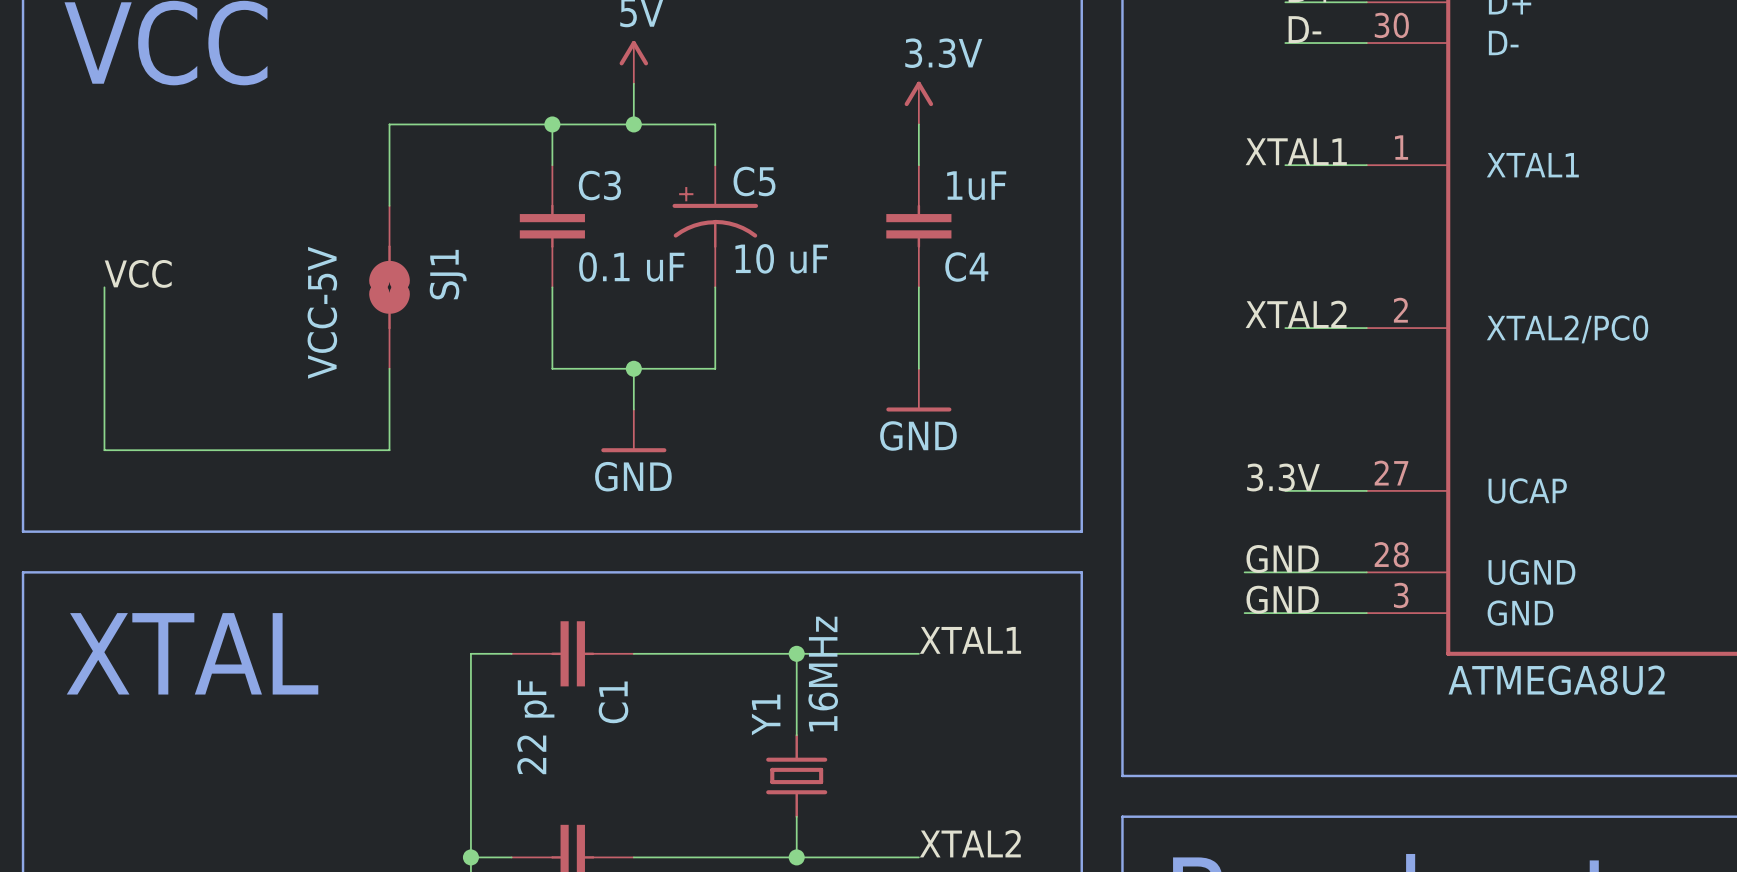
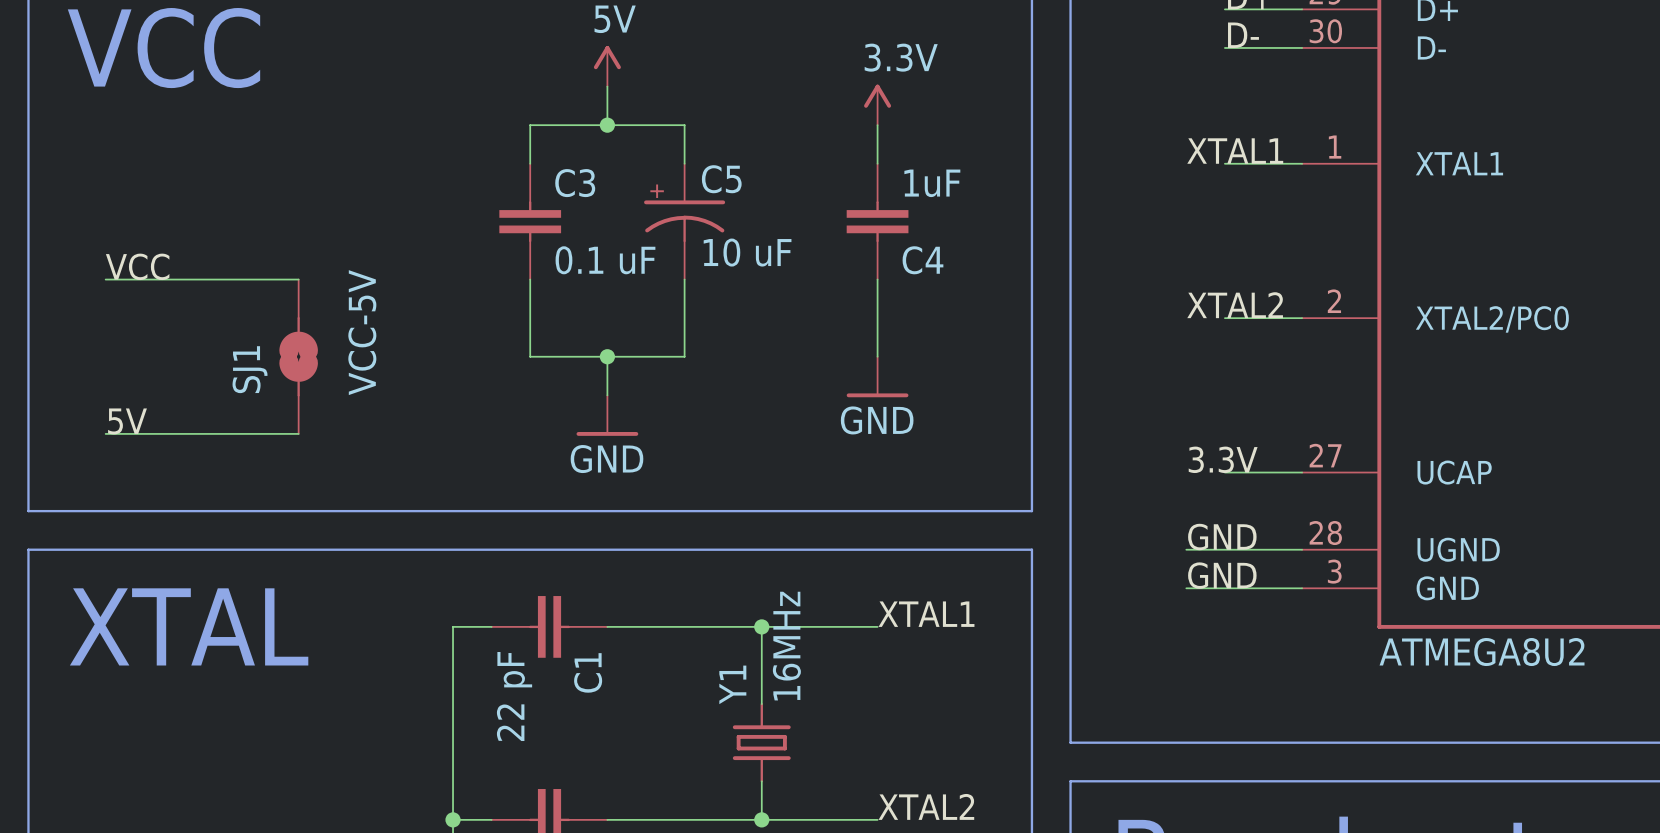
wire: (552, 124) (389, 124) (389, 205) -> none
junction: (552, 124) -> none
SJ1 name position: SJ1 (448, 274) -> SJ1 (250, 369)
wire: (104, 287) (104, 450) -> (105, 279) (298, 279)
SJ1 position: (389, 287) -> (298, 356)
SJ1 value position: VCC-5V (322, 312) -> VCC-5V (362, 332)
wire: (389, 368) (389, 450) (308, 450) -> none
label: none -> 5V (127, 421)

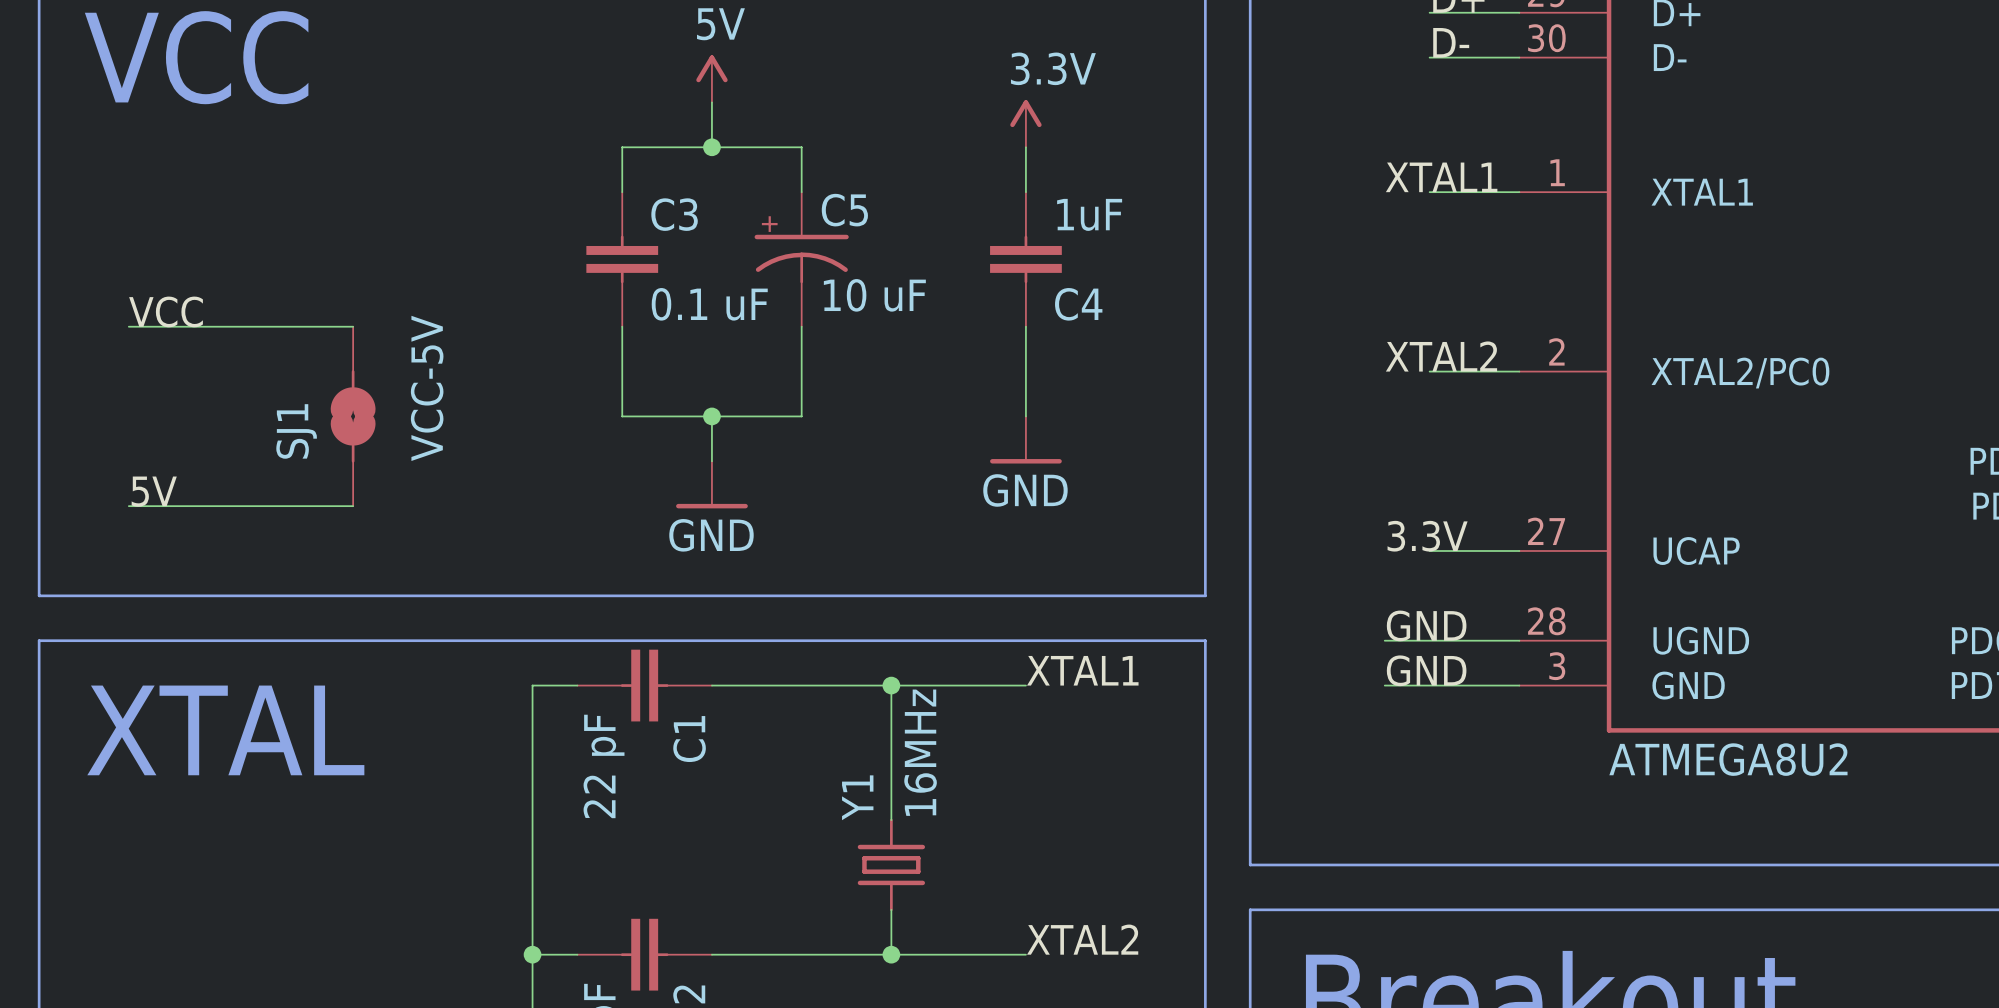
wire: none -> (891, 685) (891, 730)
label position: XTAL1 (926, 614) -> XTAL1 (1082, 670)
wire: (453, 626) (491, 626) -> (532, 730) (532, 685) (577, 685)
C1 position: (549, 626) -> (644, 685)
wire: (607, 626) (877, 626) -> (711, 685) (1025, 685)
junction position: (761, 626) -> (891, 685)

